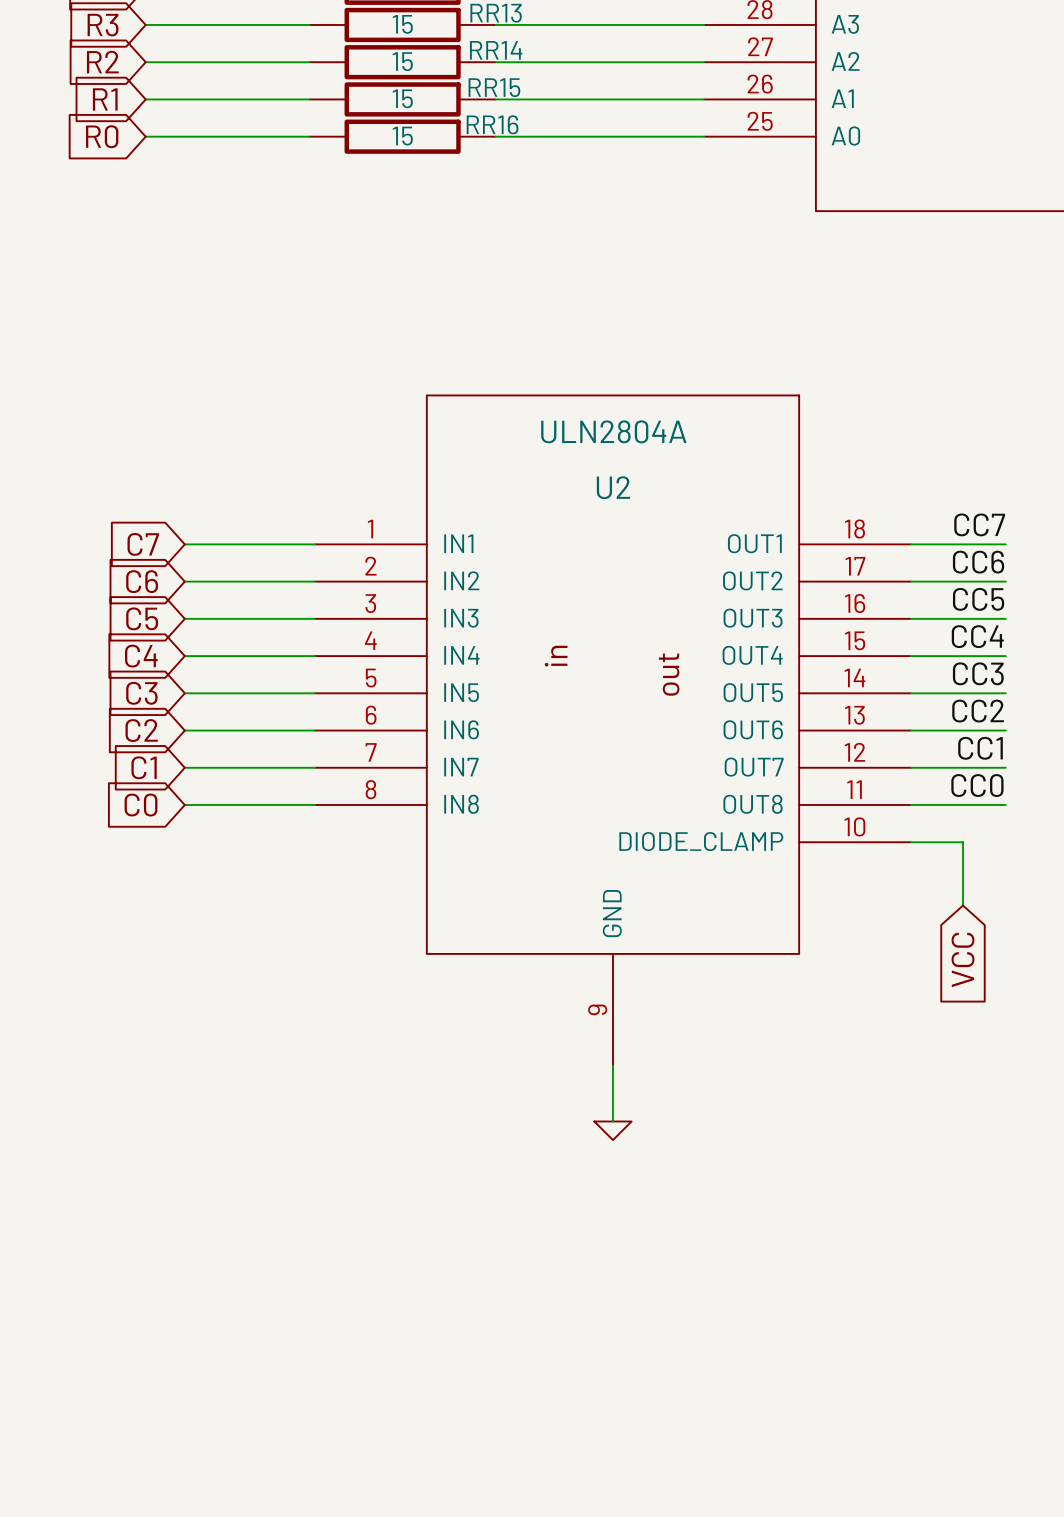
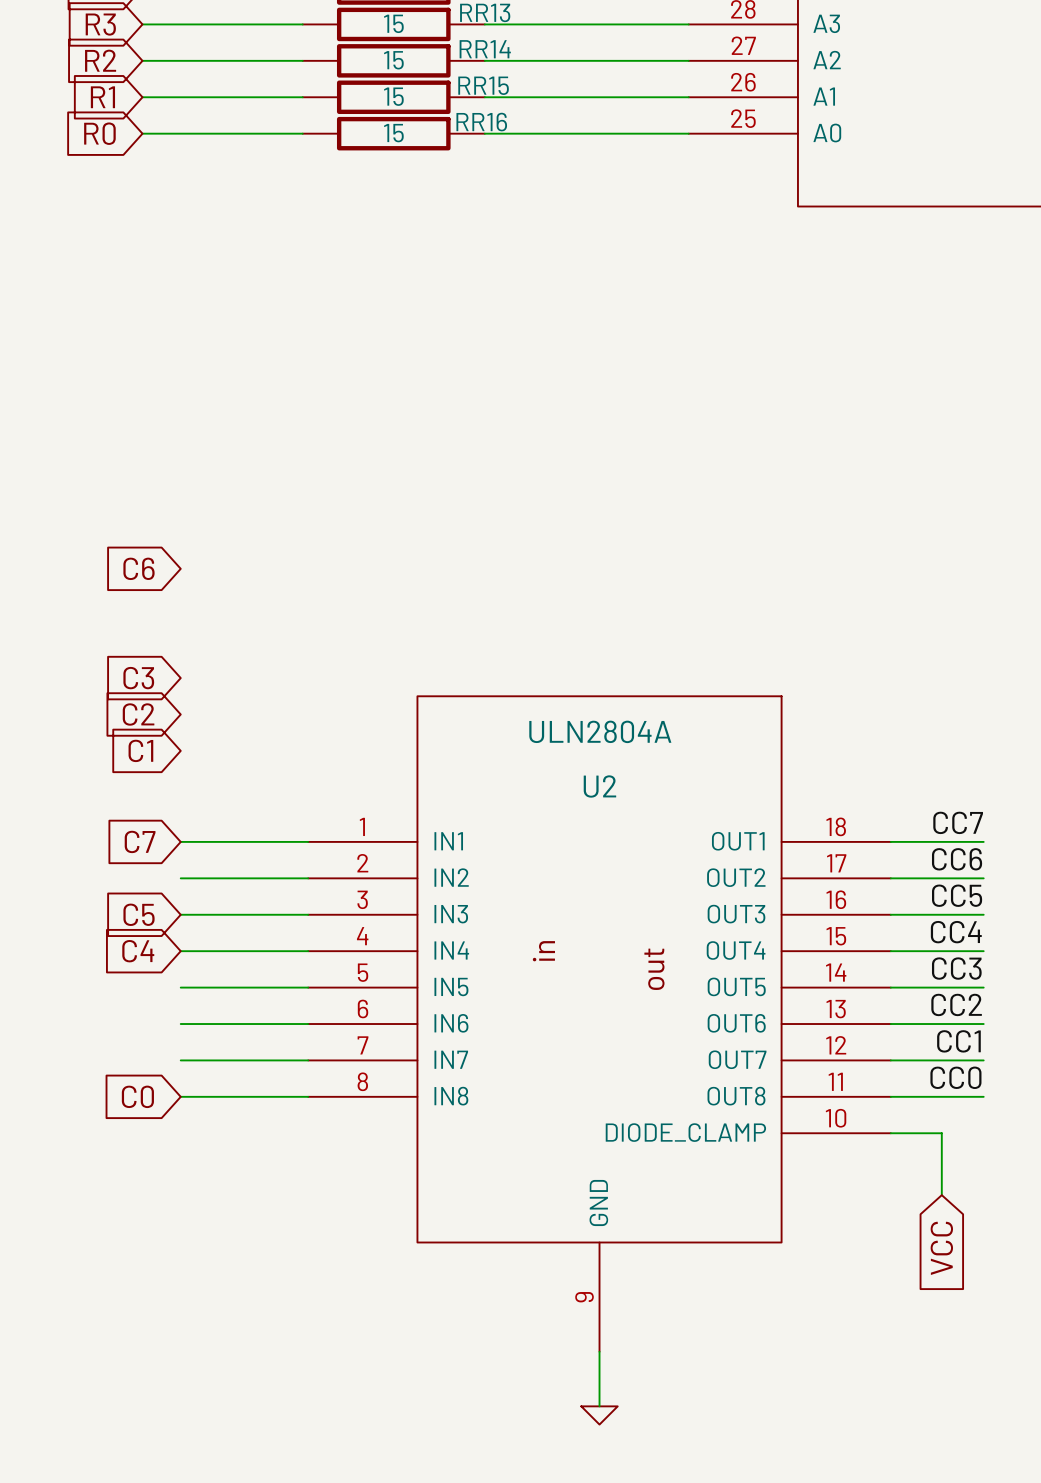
label position: CC7 (979, 524) -> CC7 (958, 822)
global label position: C7 (143, 544) -> C7 (140, 841)
wire: (184, 544) (315, 544) -> (180, 841) (308, 841)
wire: (910, 544) (1005, 544) -> (890, 841) (983, 841)
label position: CC6 (978, 562) -> CC6 (957, 859)
wire: (184, 581) (315, 581) -> (180, 878) (308, 878)
wire: (910, 581) (1005, 581) -> (890, 878) (983, 878)
label position: CC5 (978, 599) -> CC5 (957, 895)
global label position: C5 (142, 618) -> C5 (139, 914)
wire: (184, 618) (315, 618) -> (180, 914) (308, 914)
wire: (910, 618) (1005, 618) -> (890, 914) (983, 914)
label position: CC4 (977, 636) -> CC4 (956, 932)
global label position: C4 (141, 656) -> C4 (138, 951)
wire: (184, 656) (315, 656) -> (180, 951) (308, 951)
wire: (910, 656) (1005, 656) -> (890, 951) (983, 951)
label position: CC3 (978, 673) -> CC3 (956, 968)
wire: (184, 693) (315, 693) -> (180, 987) (308, 987)
wire: (910, 693) (1005, 693) -> (890, 987) (983, 987)
label position: CC2 (978, 711) -> CC2 (956, 1004)
wire: (184, 730) (315, 730) -> (180, 1024) (308, 1024)
U2 position: (612, 730) -> (599, 1024)
wire: (910, 730) (1005, 730) -> (890, 1024) (983, 1024)
label position: CC1 (980, 748) -> CC1 (958, 1041)
wire: (184, 767) (315, 767) -> (180, 1060) (308, 1060)
wire: (910, 767) (1005, 767) -> (890, 1060) (983, 1060)
label position: CC0 (977, 785) -> CC0 (955, 1077)
global label position: C0 (141, 805) -> C0 (137, 1096)
wire: (184, 805) (315, 805) -> (180, 1096) (308, 1096)
wire: (910, 805) (1005, 805) -> (890, 1096) (983, 1096)
wire: (910, 842) (962, 842) (962, 905) -> (890, 1133) (941, 1133) (941, 1195)
global label position: VCC (963, 959) -> VCC (941, 1248)
wire: (612, 1065) (612, 1121) -> (599, 1351) (599, 1406)
power symbol position: (612, 1130) -> (599, 1415)

